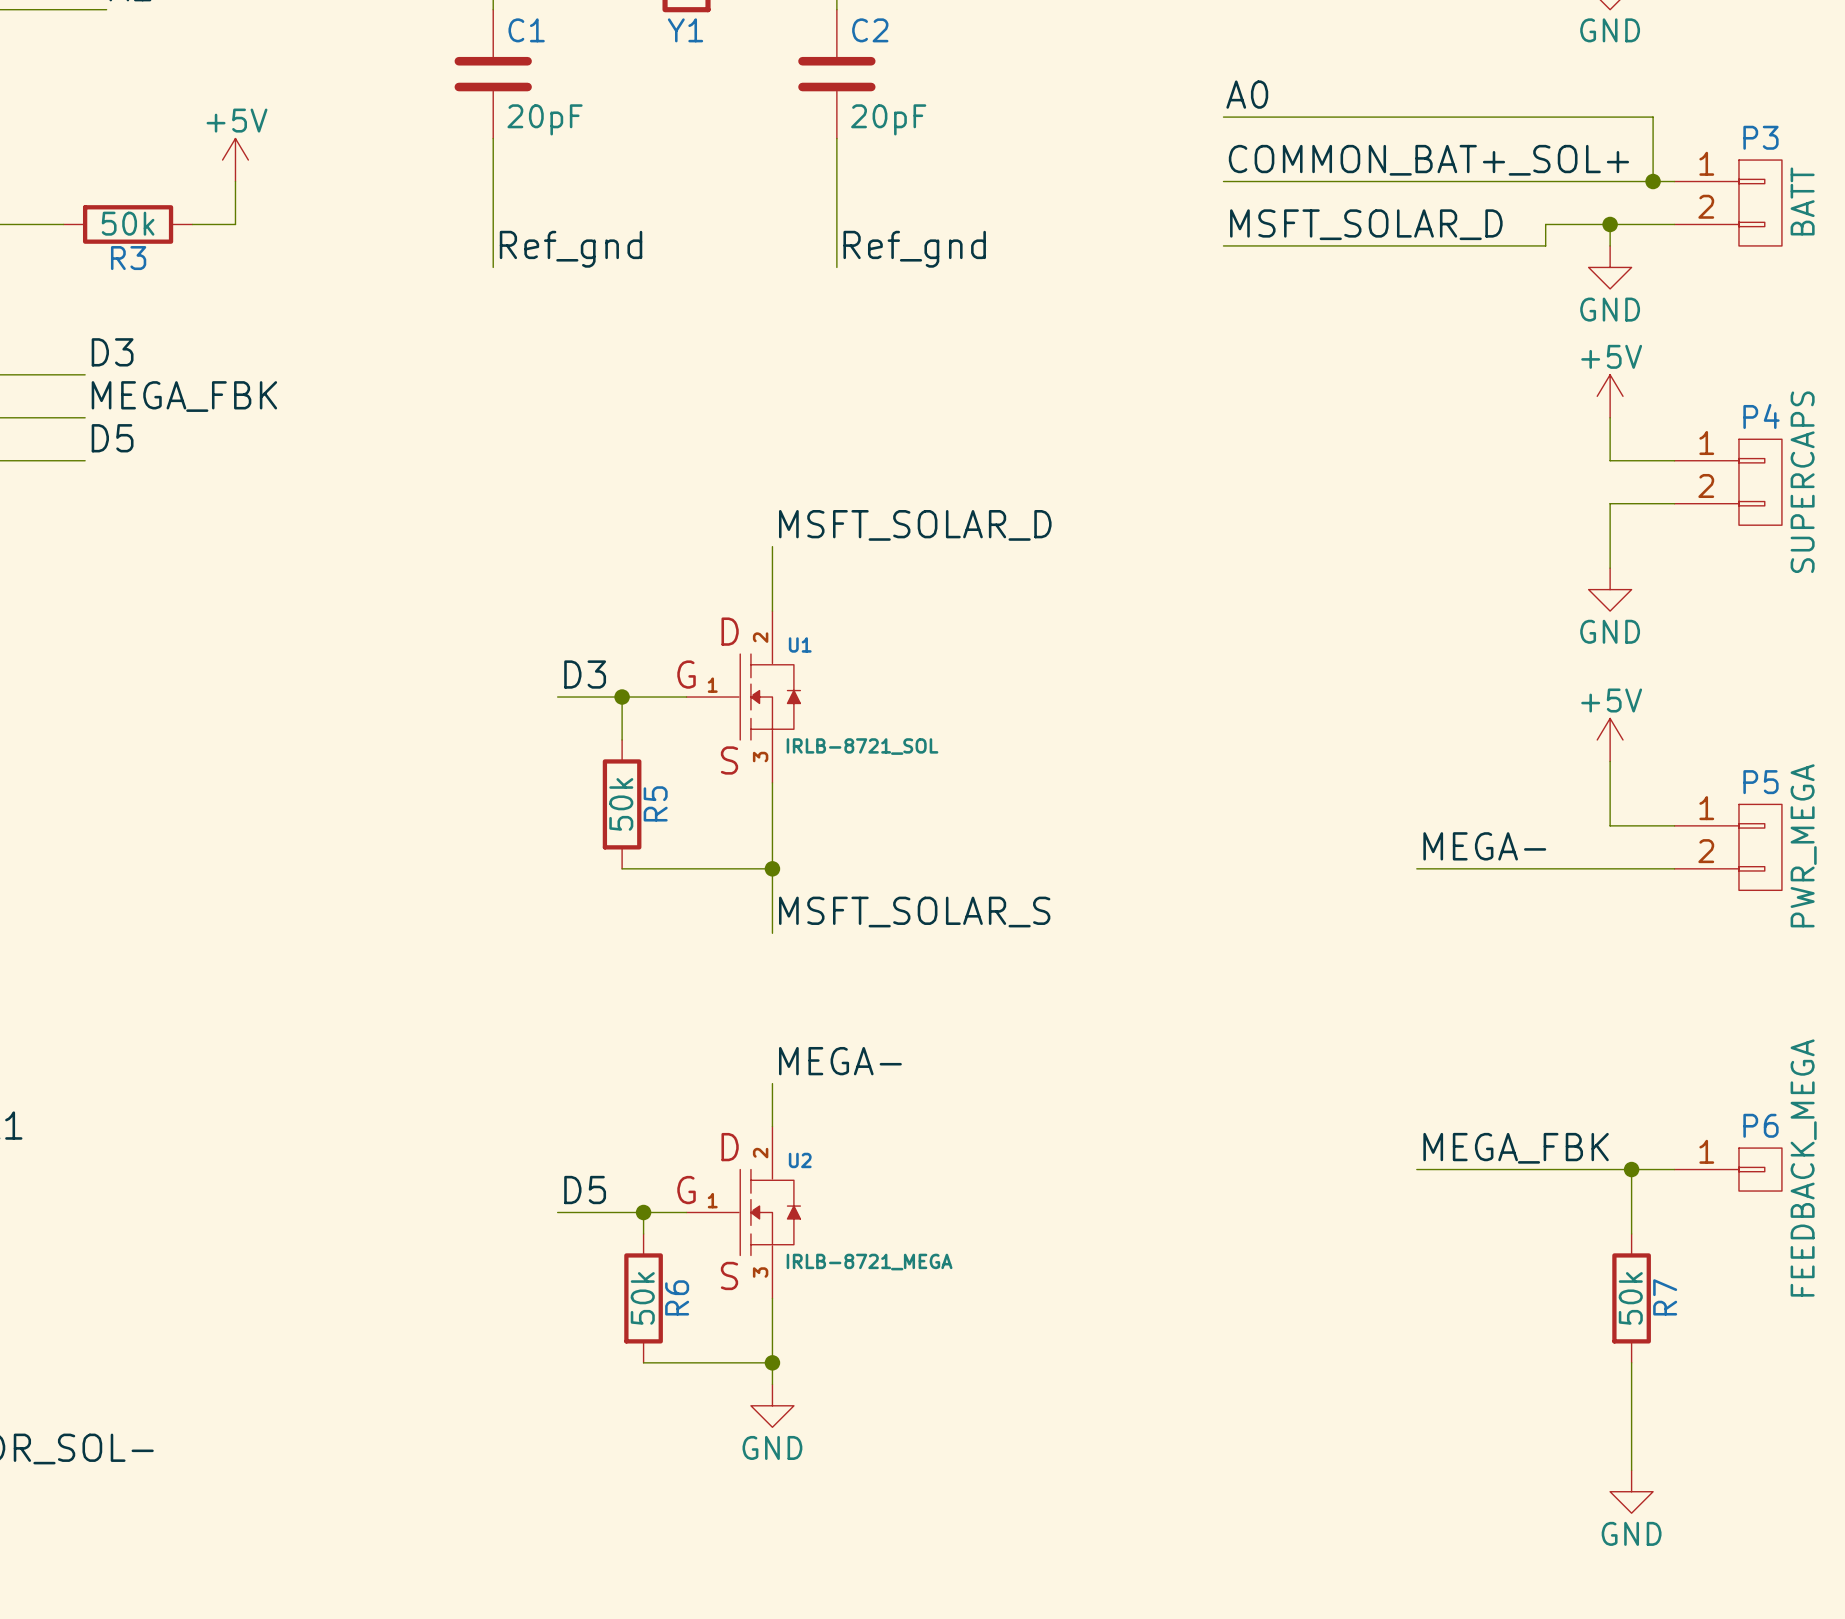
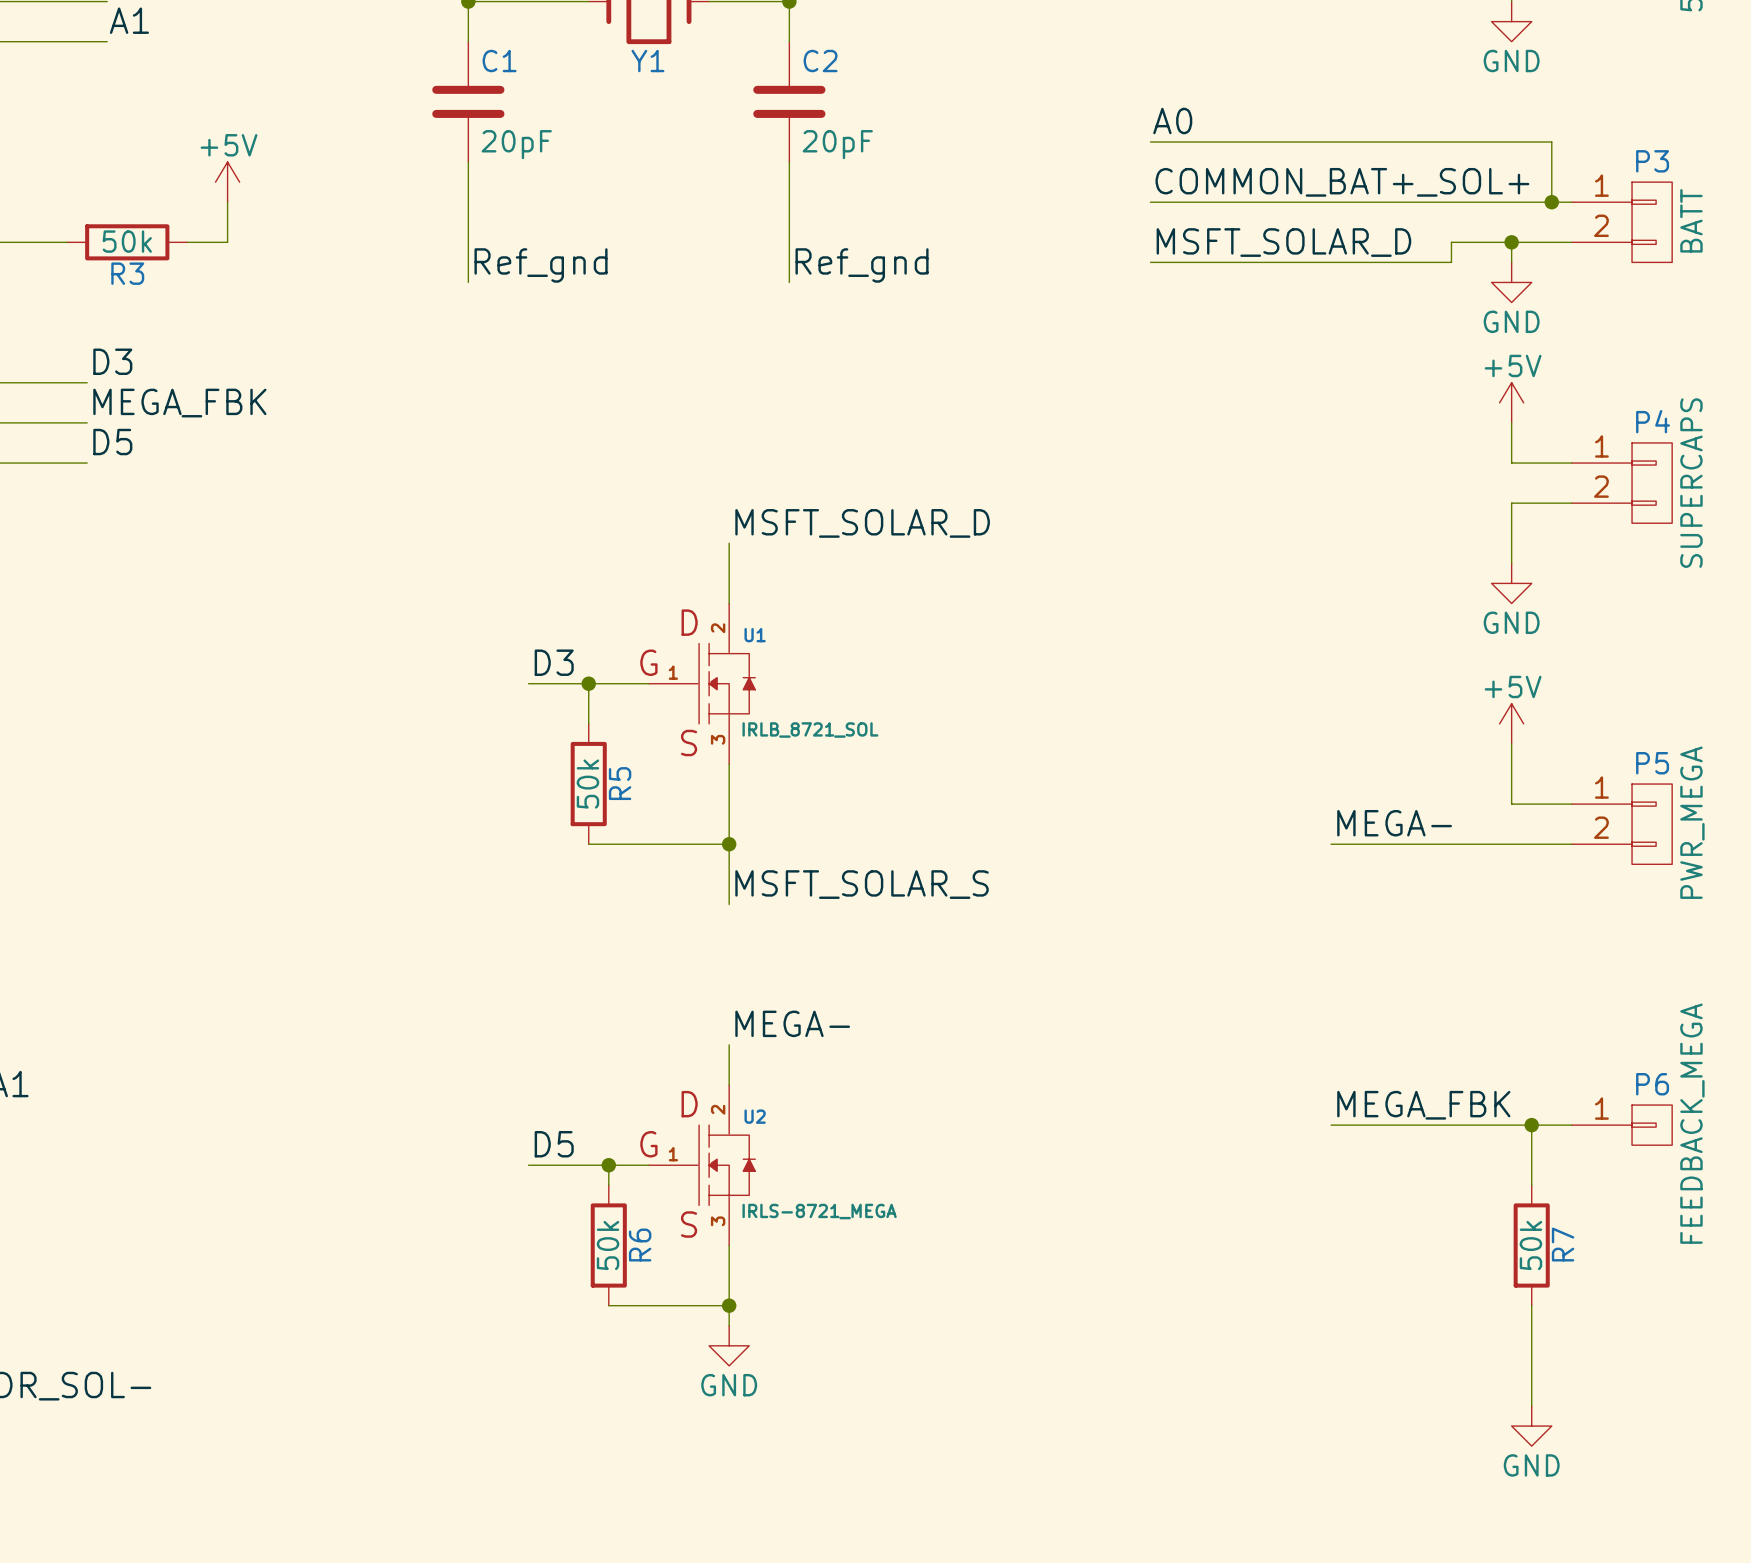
U1 value: IRLB-8721_SOL (862, 746) -> IRLB_8721_SOL (810, 729)
U2 value: IRLB-8721_MEGA (869, 1262) -> IRLS-8721_MEGA (819, 1211)

